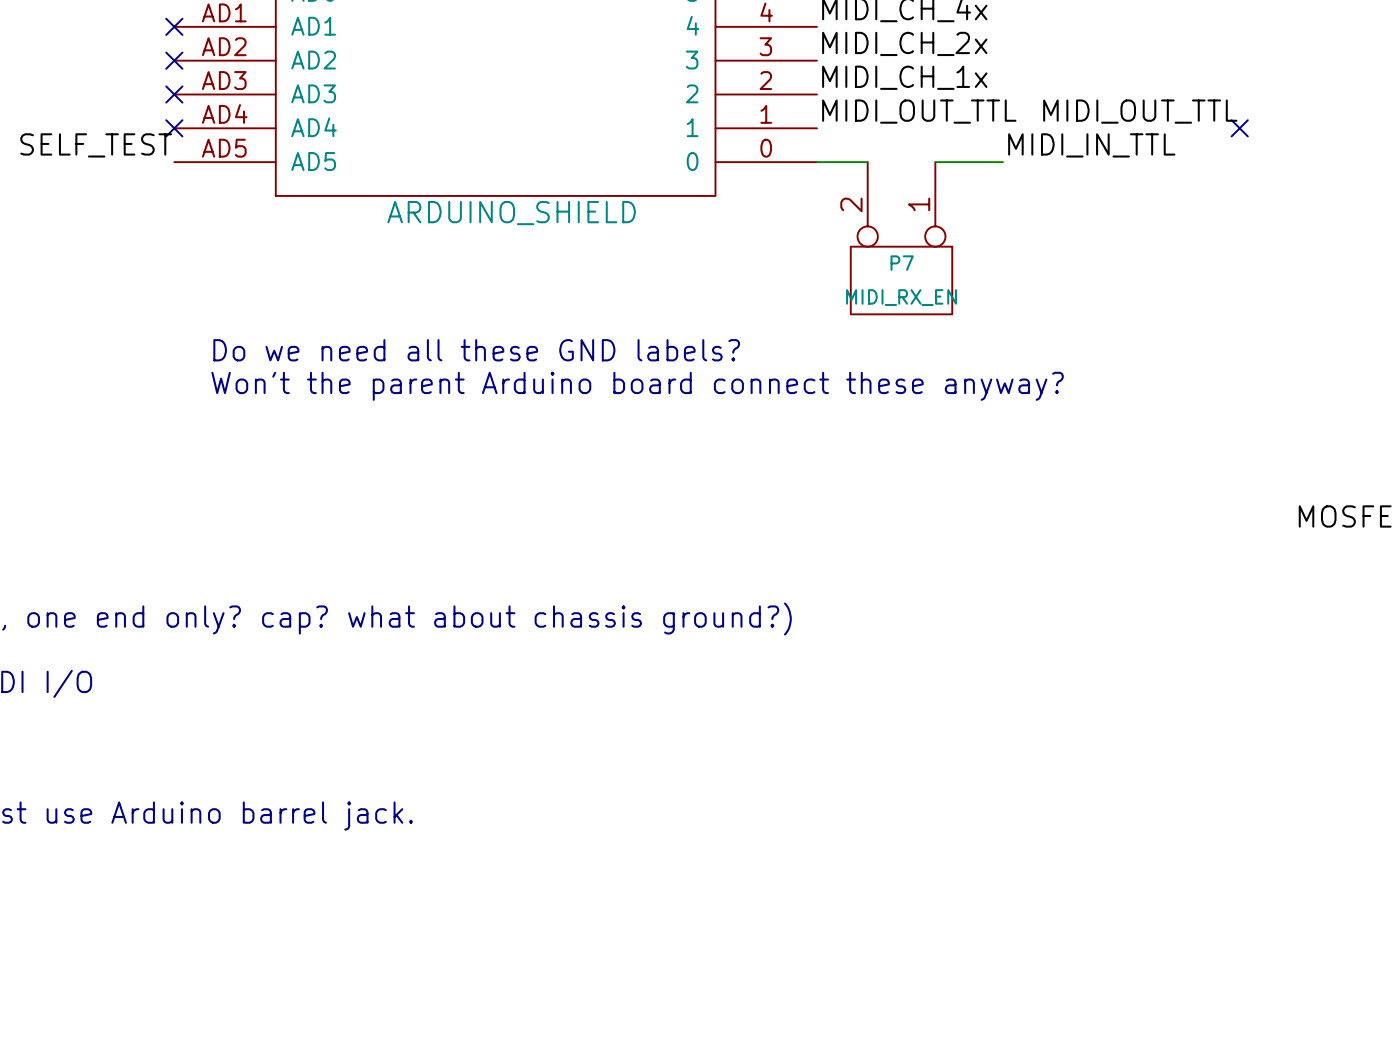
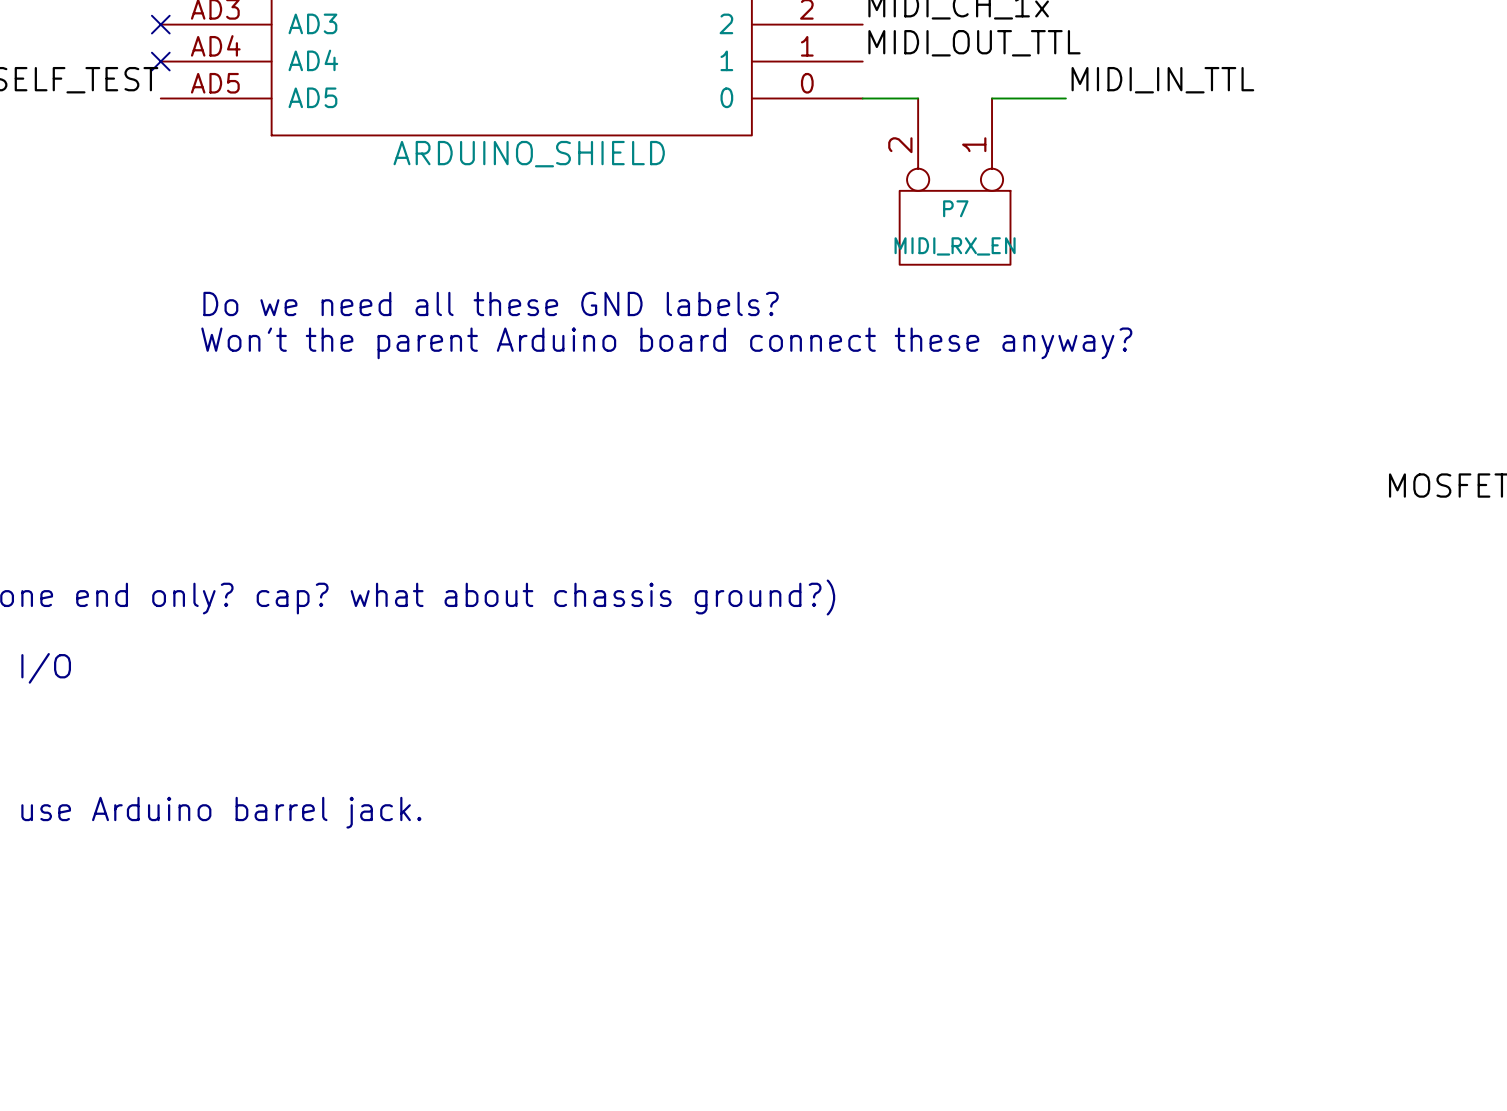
label: MIDI_OUT_TTL (1140, 111) -> none
no-connect mark: (1239, 128) -> none

